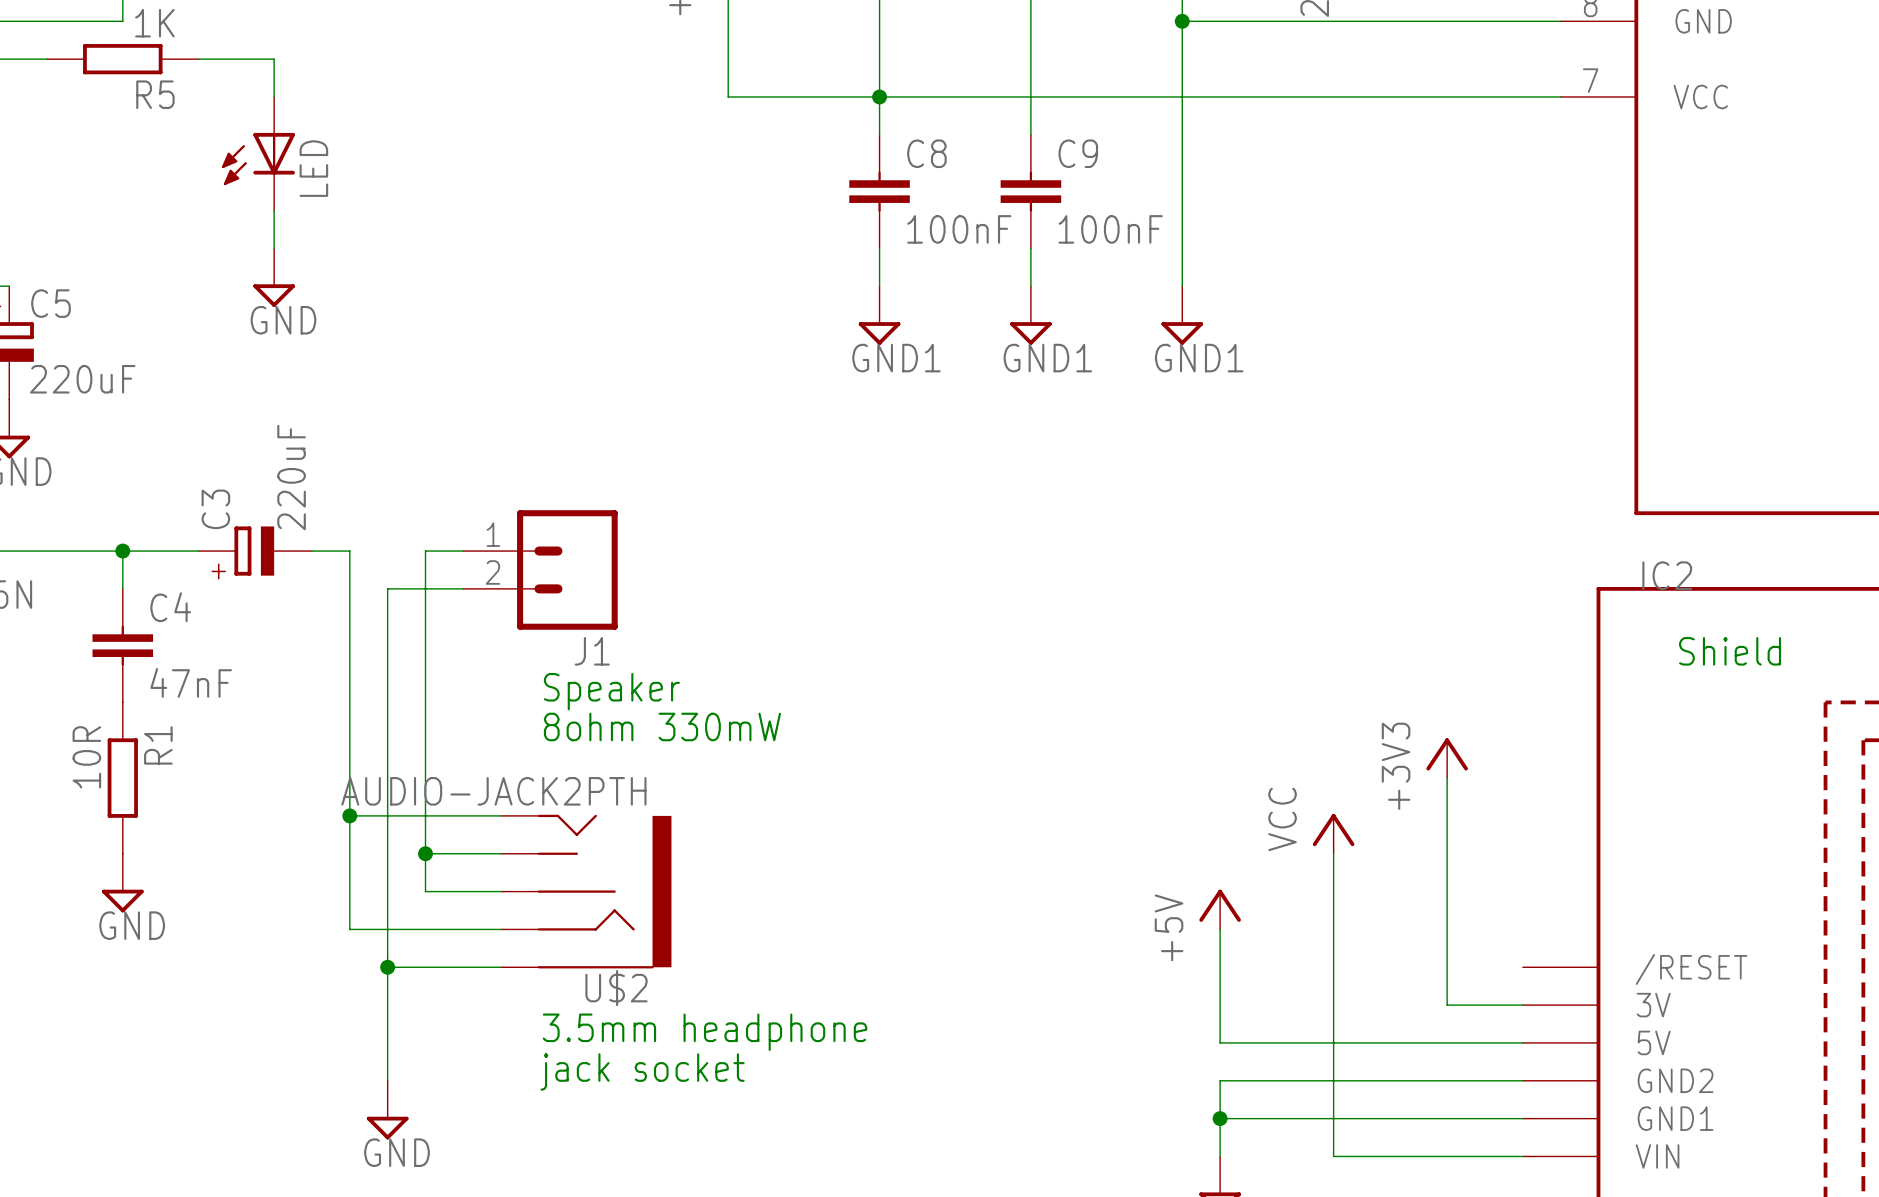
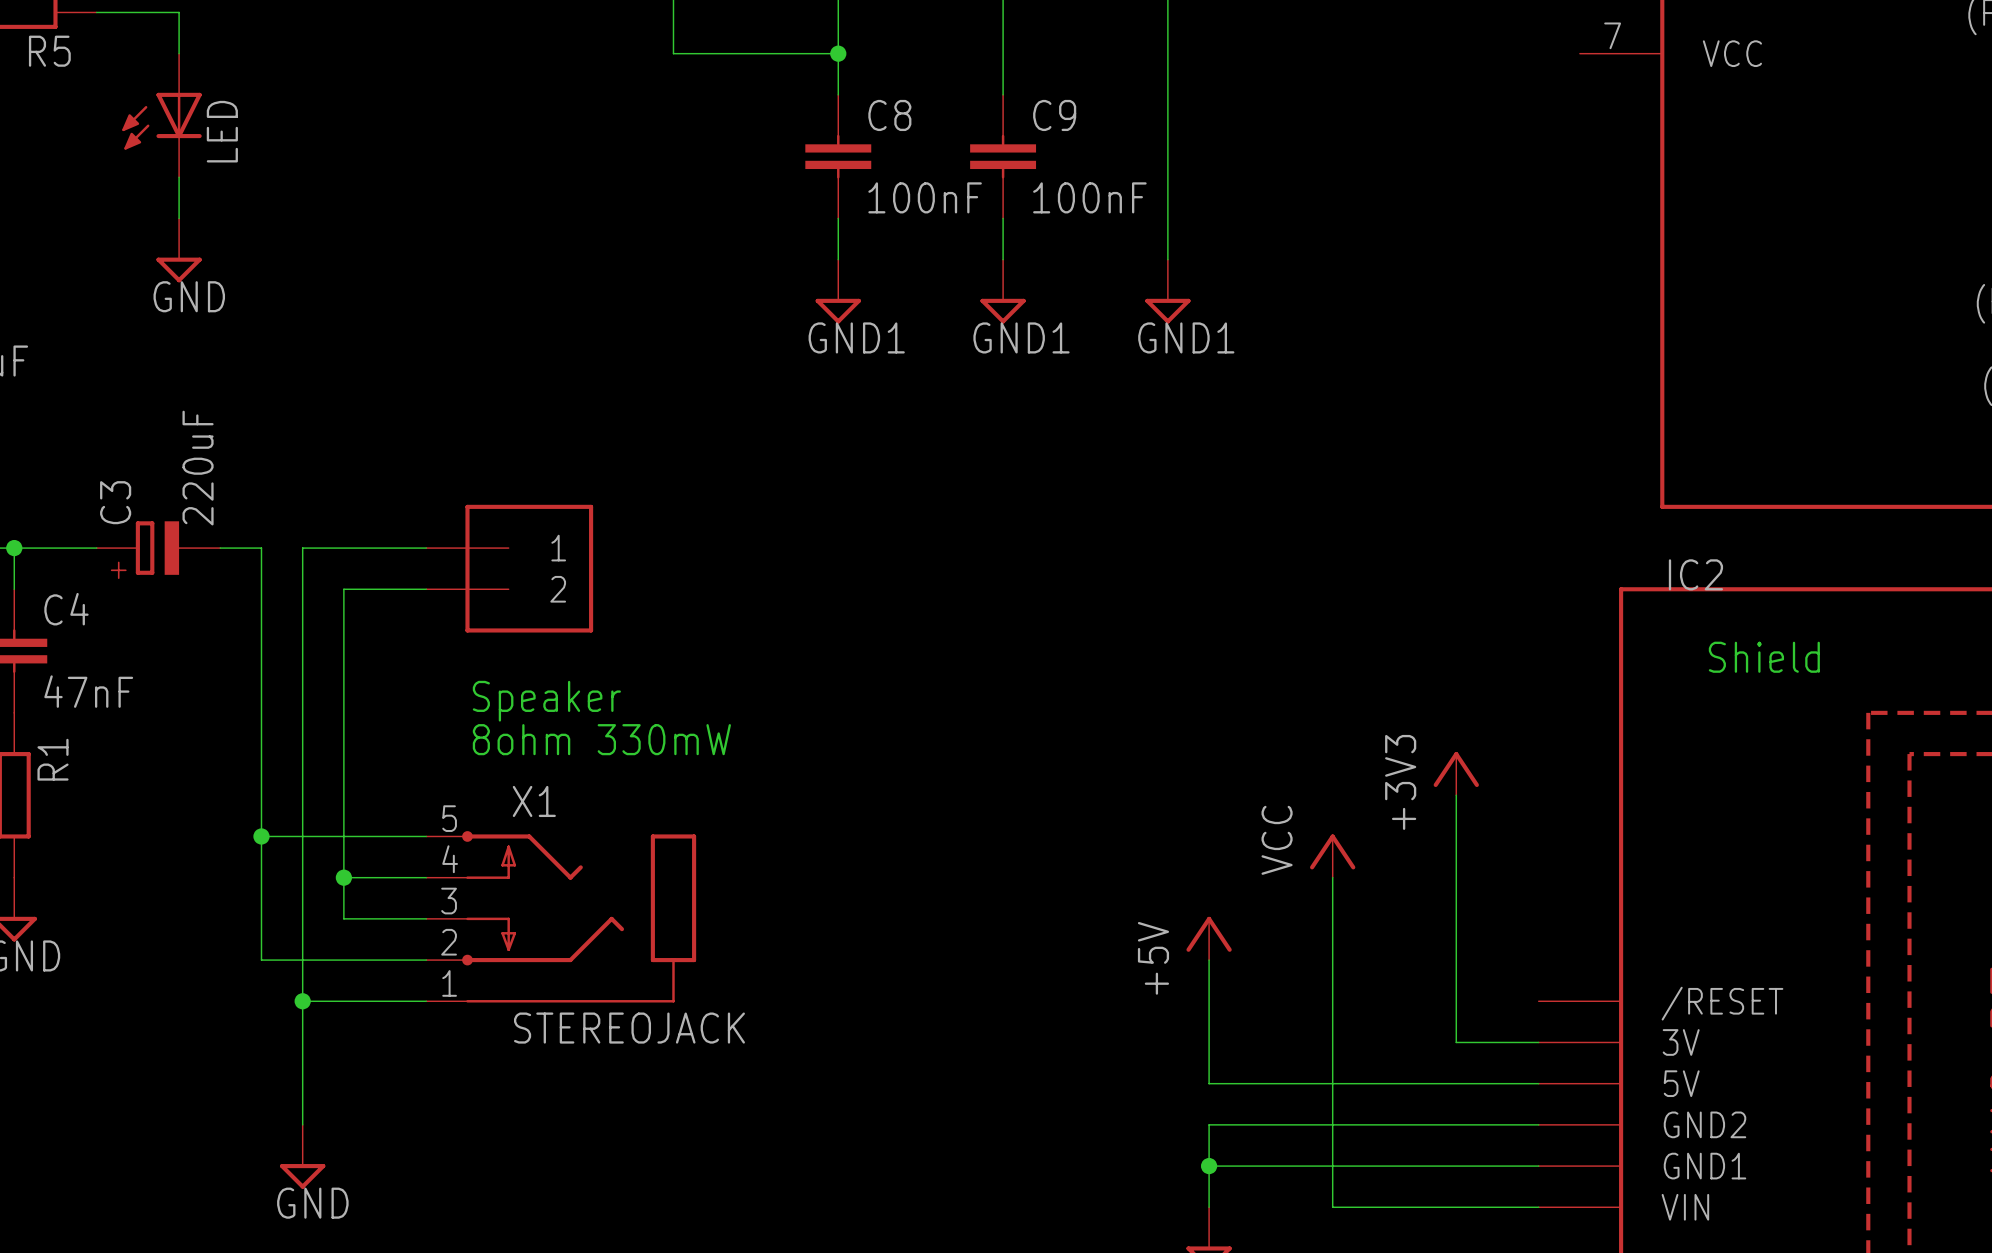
wire: (879, 96) (1560, 96) -> none
wire: (425, 551) (425, 588) (387, 588) -> (343, 548) (302, 548) (302, 589)
J1: (540, 569) -> none
part: none -> (509, 568)
X1: none -> STEREOJACK (561, 916)
U$2: AUDIO-JACK2PTH (586, 891) -> none
text: 3.5mm headphone (705, 1032) -> none
text: jack socket (642, 1071) -> none

